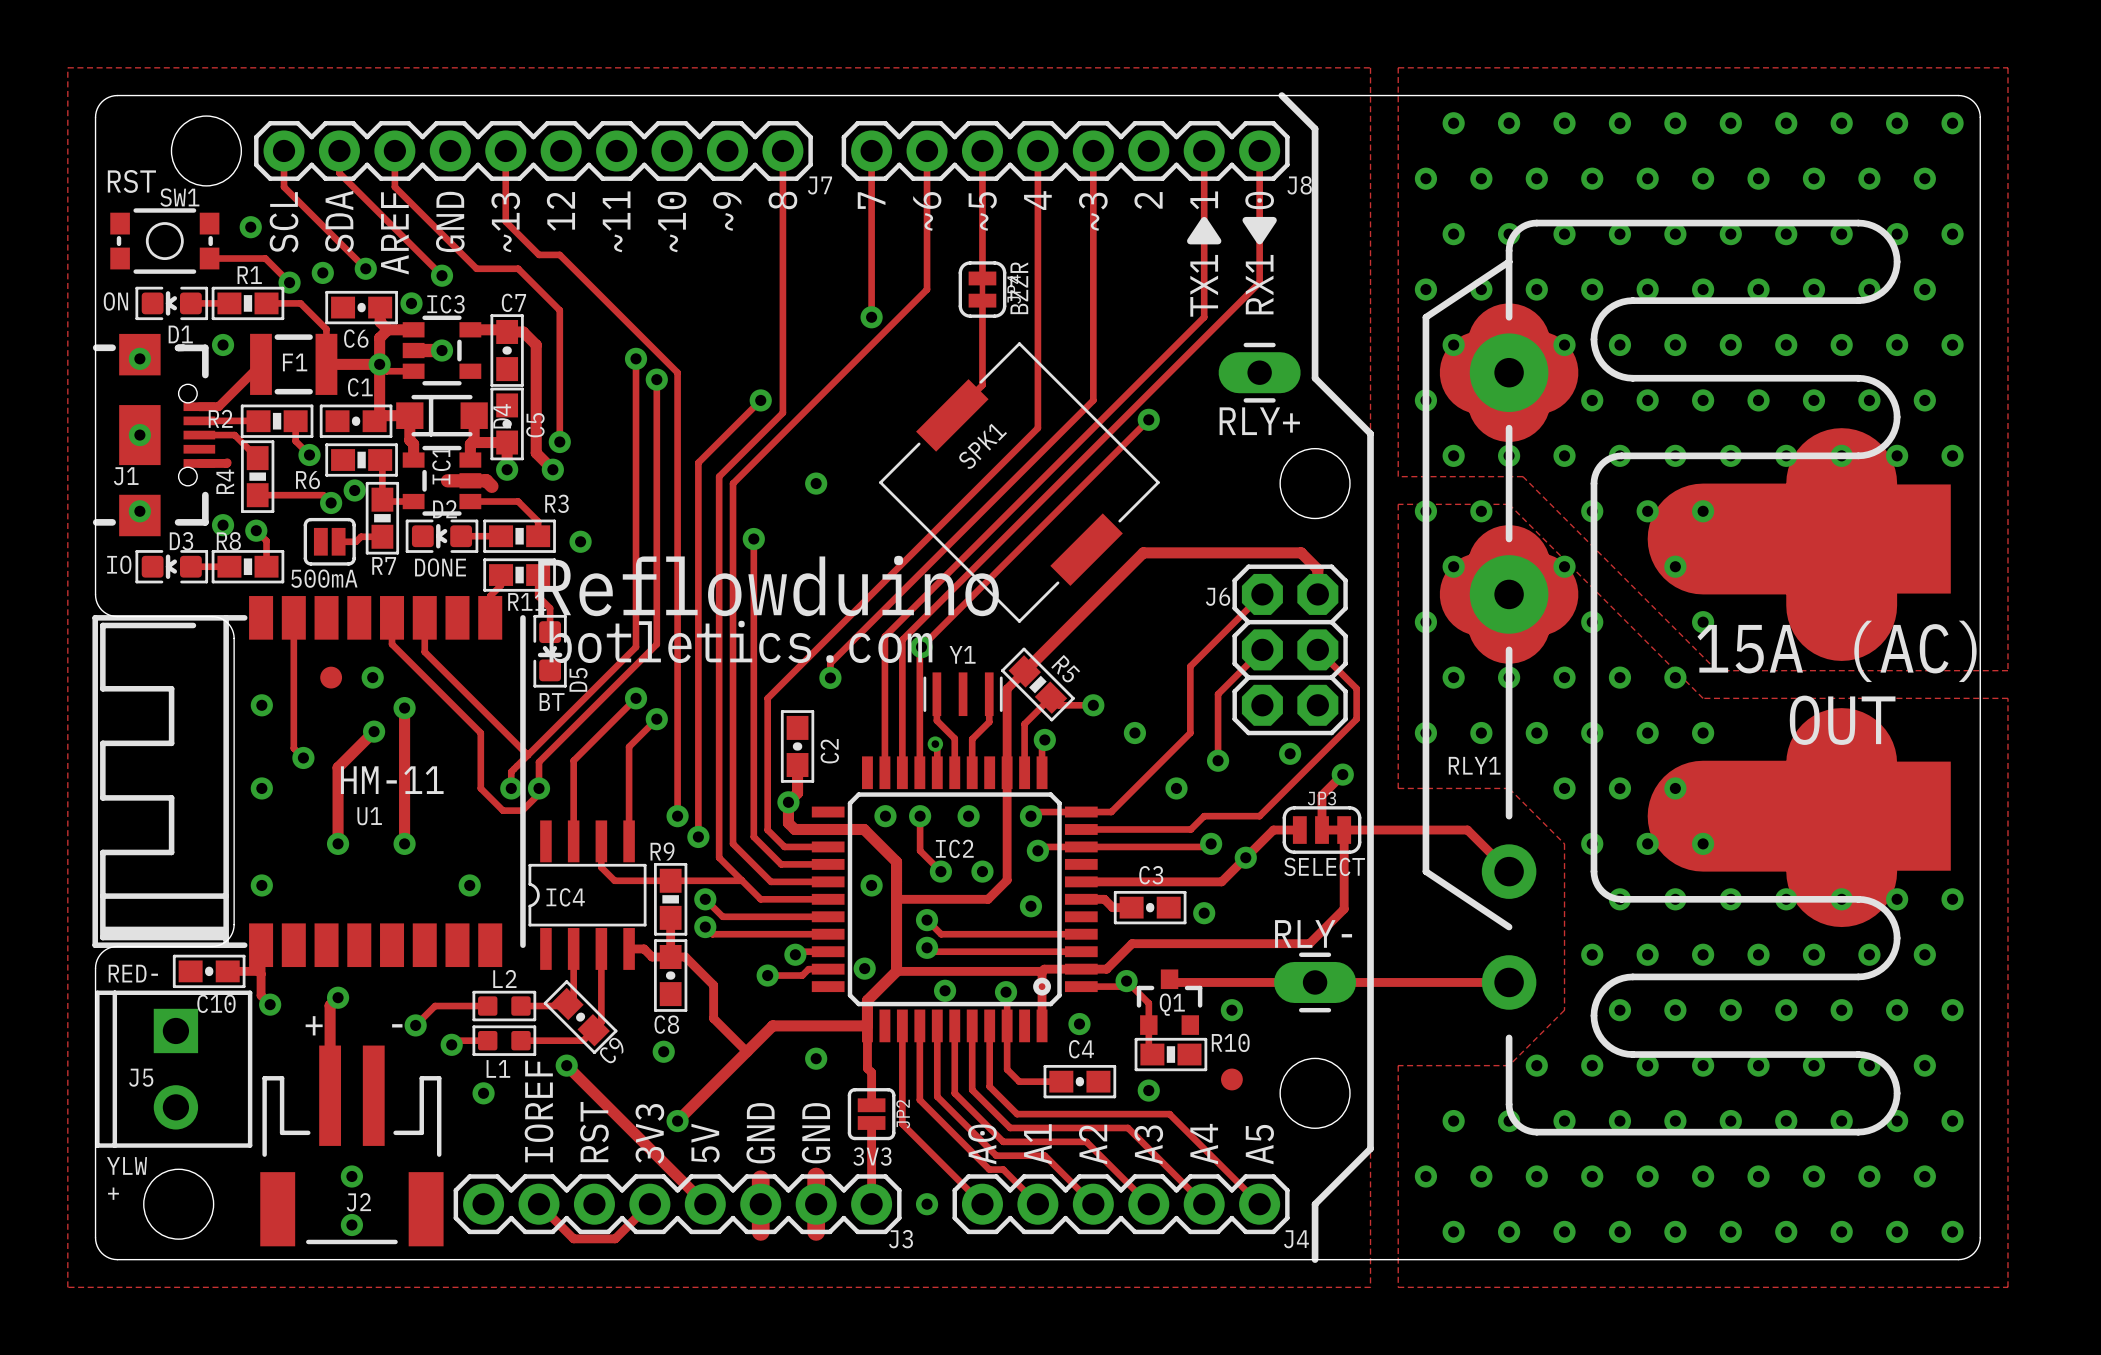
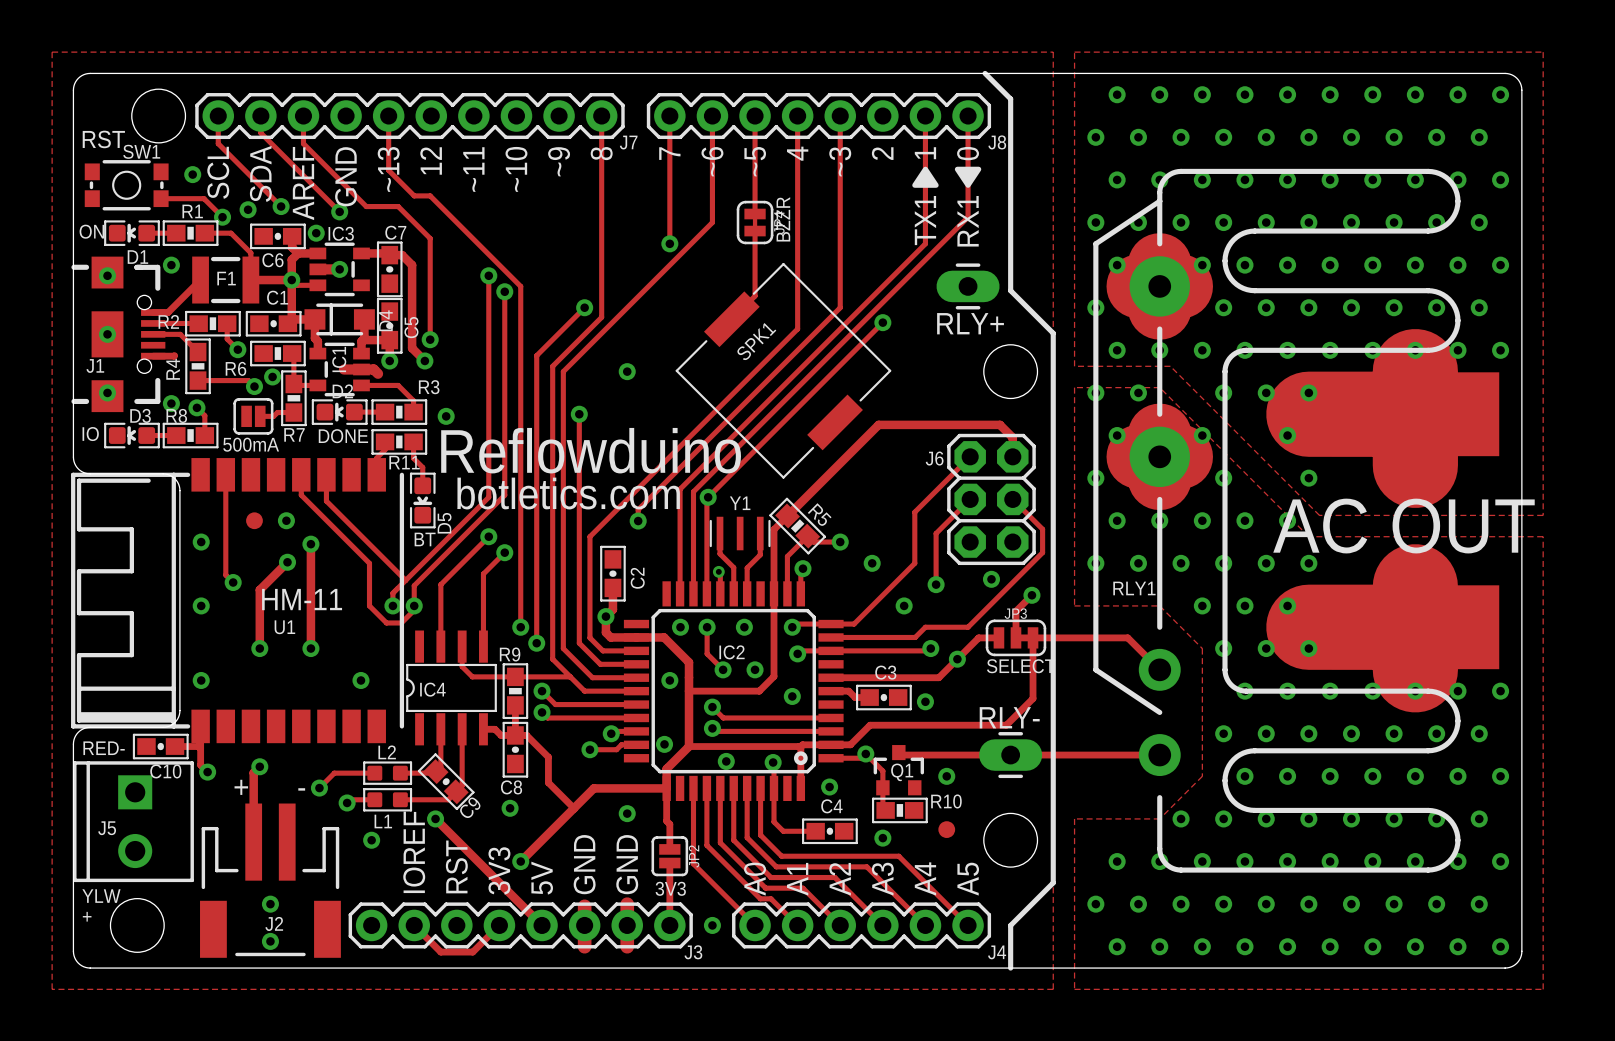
text: 15A (AC) (1837, 651) -> none
text: OUT (1842, 720) -> AC OUT (1403, 526)

